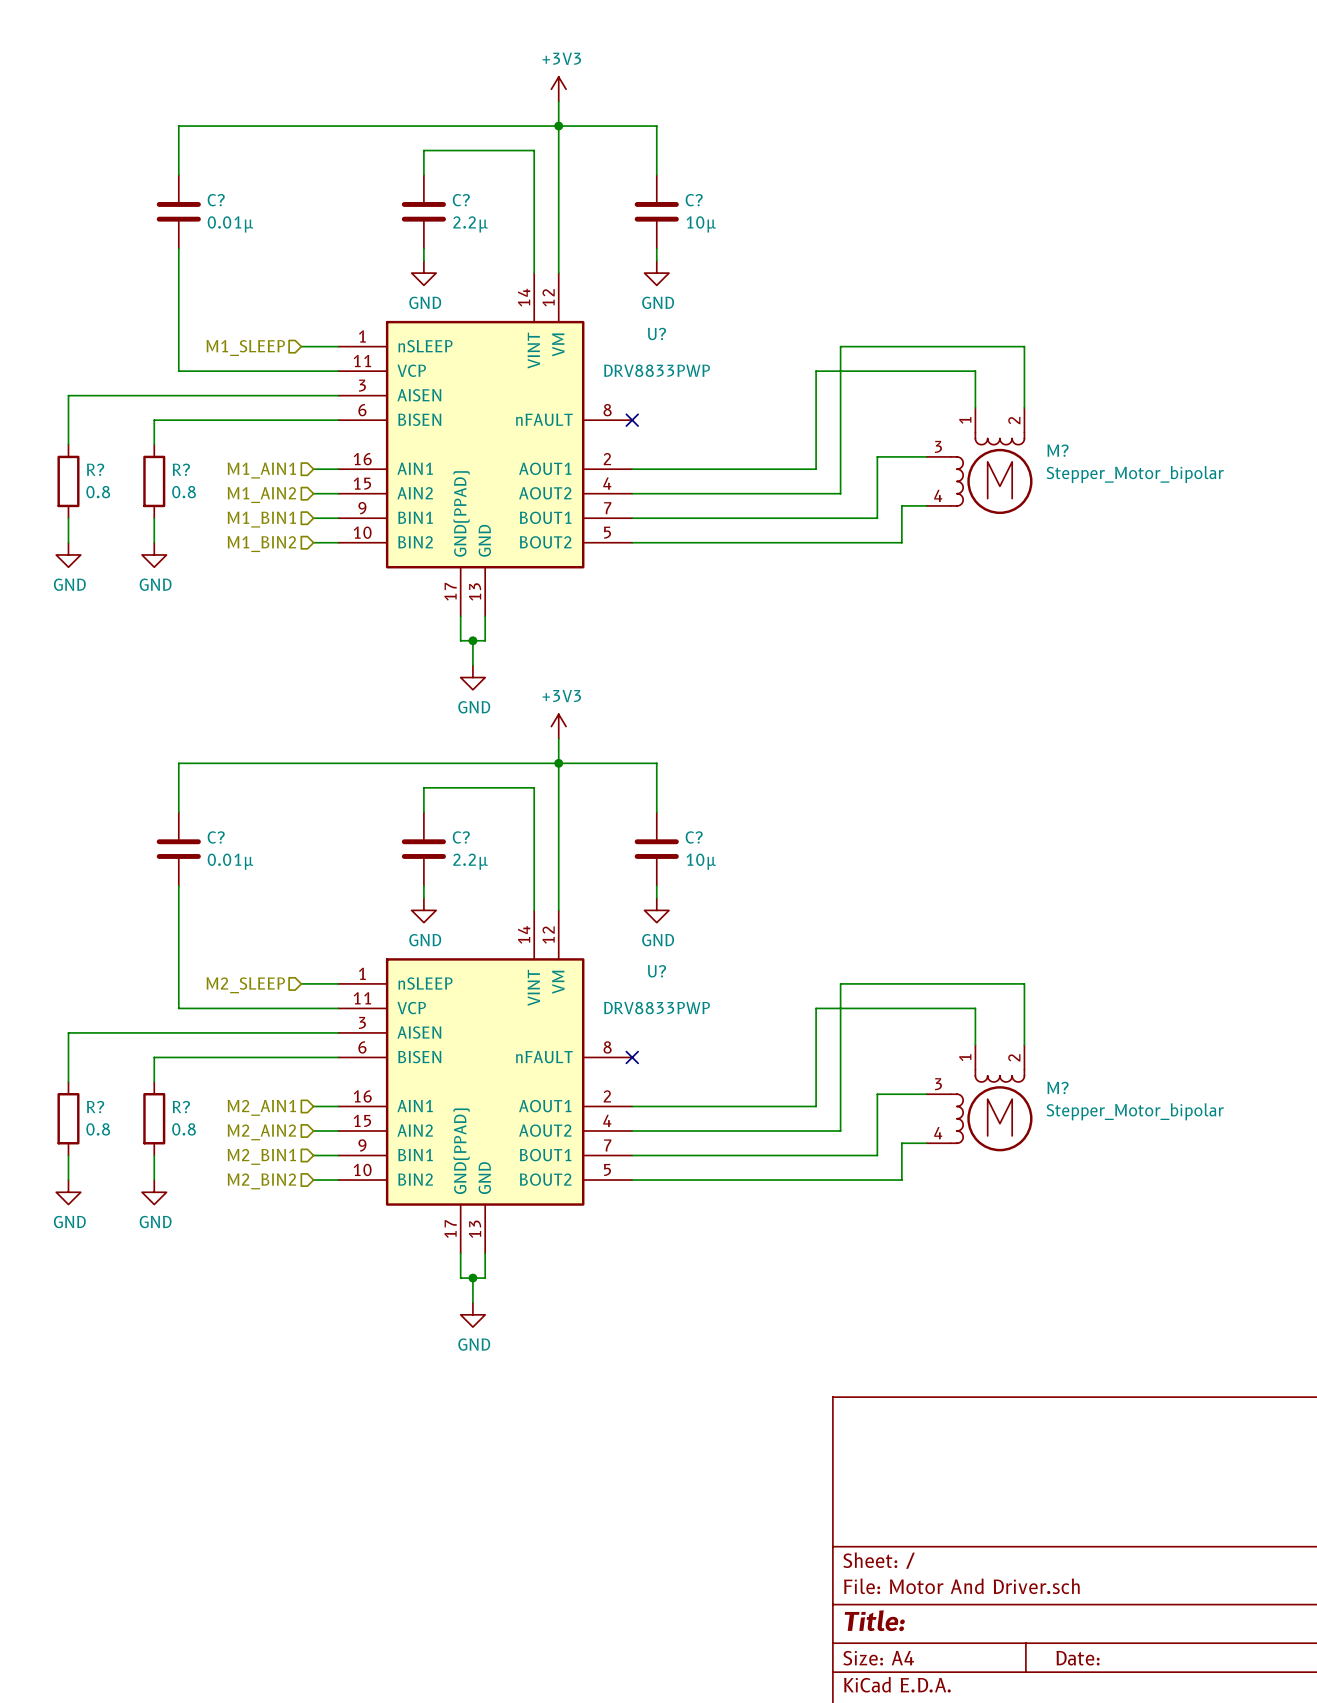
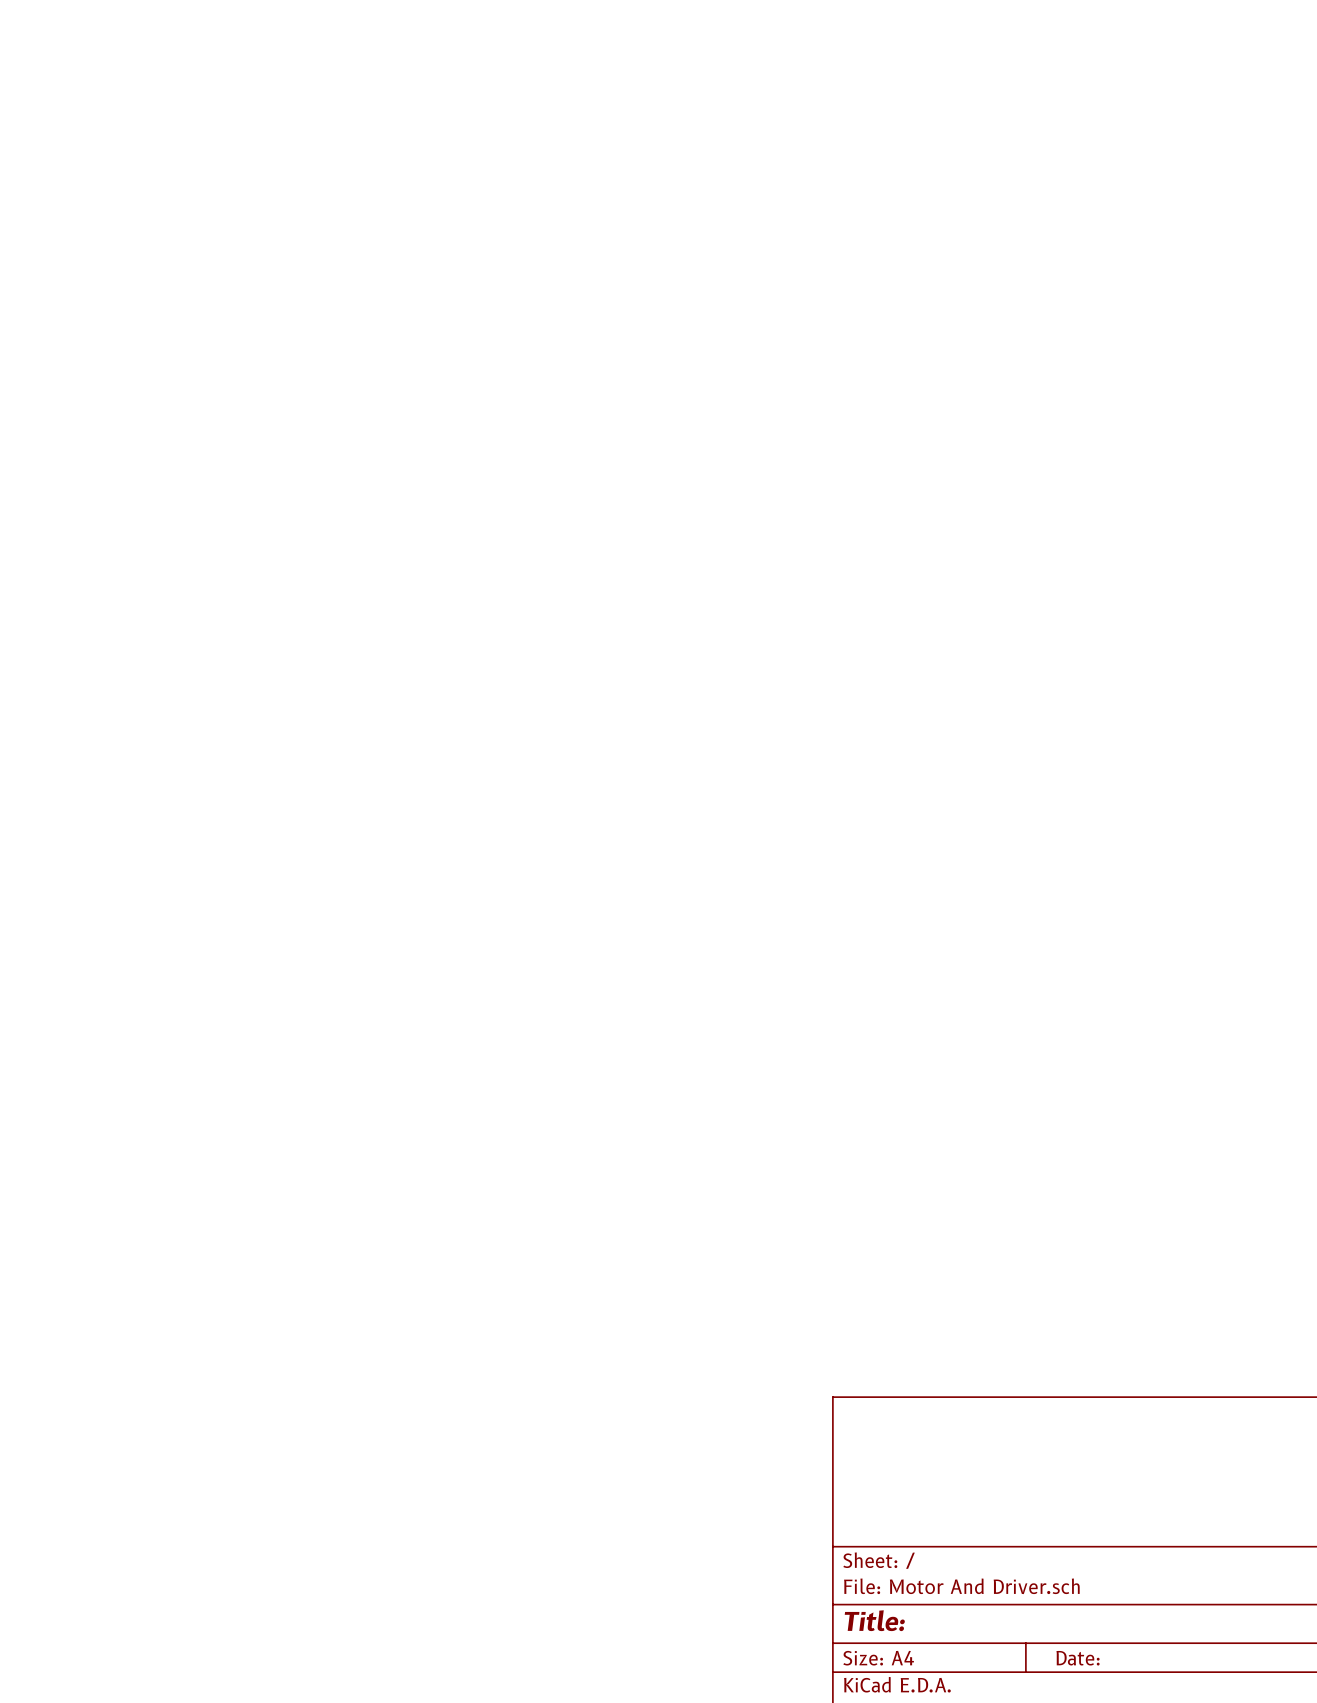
power symbol: +3V3 (558, 89) -> none
wire: (558, 101) (558, 273) -> none
junction: (558, 126) -> none
wire: (178, 175) (178, 126) (656, 126) (656, 175) -> none
wire: (423, 175) (423, 150) (534, 150) (534, 273) -> none
C?: 0.01µ (178, 211) -> none
C?: 2.2µ (423, 211) -> none
C?: 10µ (656, 211) -> none
wire: (178, 248) (178, 371) (338, 371) -> none
wire: (423, 248) (423, 260) -> none
wire: (656, 248) (656, 260) -> none
power symbol: GND (423, 273) -> none
power symbol: GND (656, 273) -> none
wire: (301, 346) (338, 346) -> none
hierarchical label: M1_SLEEP (245, 348) -> none
wire: (338, 395) (68, 395) (68, 444) -> none
wire: (975, 407) (975, 371) (816, 371) (816, 469) (632, 469) -> none
wire: (1024, 407) (1024, 346) (840, 346) (840, 493) (632, 493) -> none
wire: (338, 420) (154, 420) (154, 444) -> none
no-connect mark: (632, 420) -> none
U?: DRV8833PWP (485, 444) -> none
wire: (926, 456) (877, 456) (877, 518) (632, 518) -> none
M?: Stepper_Motor_bipolar (979, 460) -> none
wire: (313, 469) (338, 469) -> none
hierarchical label: M1_AIN1 (261, 470) -> none
R?: 0.8 (68, 481) -> none
R?: 0.8 (154, 481) -> none
wire: (313, 493) (338, 493) -> none
hierarchical label: M1_AIN2 (261, 495) -> none
wire: (926, 505) (901, 505) (901, 542) (632, 542) -> none
wire: (68, 518) (68, 542) -> none
wire: (154, 518) (154, 542) -> none
wire: (313, 518) (338, 518) -> none
hierarchical label: M1_BIN1 (261, 519) -> none
wire: (313, 542) (338, 542) -> none
hierarchical label: M1_BIN2 (261, 544) -> none
power symbol: GND (68, 554) -> none
power symbol: GND (154, 554) -> none
wire: (460, 616) (460, 640) (485, 640) (485, 616) -> none
wire: (472, 640) (472, 665) -> none
junction: (472, 640) -> none
power symbol: GND (472, 677) -> none
power symbol: +3V3 (558, 726) -> none
wire: (558, 738) (558, 910) -> none
junction: (558, 763) -> none
wire: (178, 812) (178, 763) (656, 763) (656, 812) -> none
wire: (423, 812) (423, 787) (534, 787) (534, 910) -> none
C?: 0.01µ (178, 849) -> none
C?: 2.2µ (423, 849) -> none
C?: 10µ (656, 849) -> none
wire: (178, 885) (178, 1008) (338, 1008) -> none
wire: (423, 885) (423, 898) -> none
wire: (656, 885) (656, 898) -> none
power symbol: GND (423, 910) -> none
power symbol: GND (656, 910) -> none
wire: (301, 983) (338, 983) -> none
hierarchical label: M2_SLEEP (245, 985) -> none
wire: (338, 1032) (68, 1032) (68, 1081) -> none
wire: (975, 1045) (975, 1008) (816, 1008) (816, 1106) (632, 1106) -> none
wire: (1024, 1045) (1024, 983) (840, 983) (840, 1130) (632, 1130) -> none
wire: (338, 1057) (154, 1057) (154, 1081) -> none
no-connect mark: (632, 1057) -> none
U?: DRV8833PWP (485, 1081) -> none
wire: (926, 1094) (877, 1094) (877, 1155) (632, 1155) -> none
M?: Stepper_Motor_bipolar (979, 1098) -> none
wire: (313, 1106) (338, 1106) -> none
hierarchical label: M2_AIN1 (261, 1107) -> none
R?: 0.8 (68, 1118) -> none
R?: 0.8 (154, 1118) -> none
wire: (313, 1130) (338, 1130) -> none
hierarchical label: M2_AIN2 (261, 1132) -> none
wire: (926, 1143) (901, 1143) (901, 1180) (632, 1180) -> none
wire: (68, 1155) (68, 1180) -> none
wire: (154, 1155) (154, 1180) -> none
wire: (313, 1155) (338, 1155) -> none
hierarchical label: M2_BIN1 (261, 1156) -> none
wire: (313, 1180) (338, 1180) -> none
hierarchical label: M2_BIN2 (261, 1181) -> none
power symbol: GND (68, 1192) -> none
power symbol: GND (154, 1192) -> none
wire: (460, 1253) (460, 1278) (485, 1278) (485, 1253) -> none
wire: (472, 1278) (472, 1302) -> none
junction: (472, 1278) -> none
power symbol: GND (472, 1314) -> none

